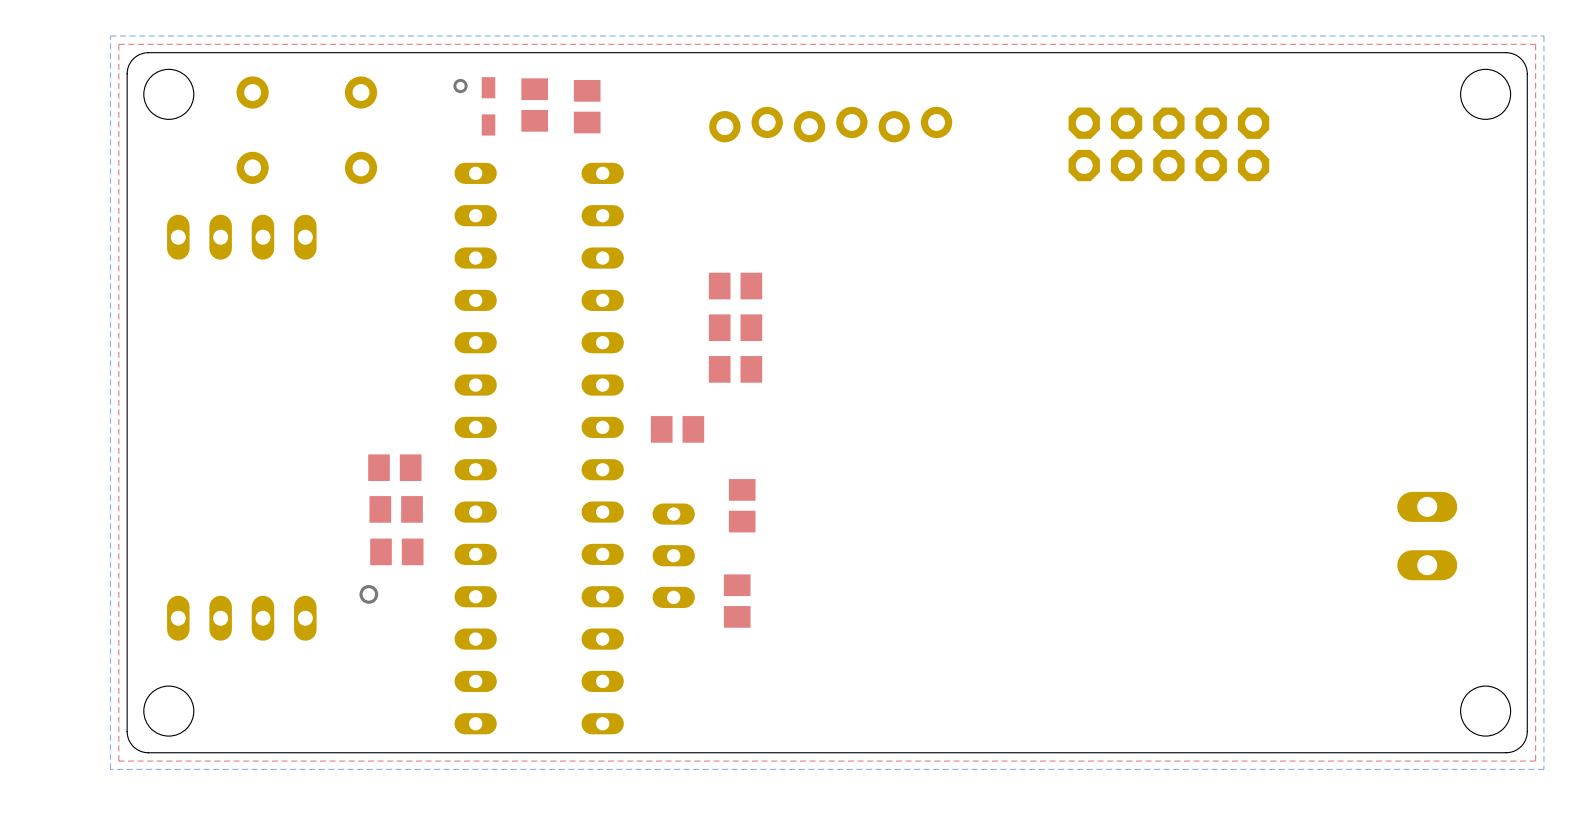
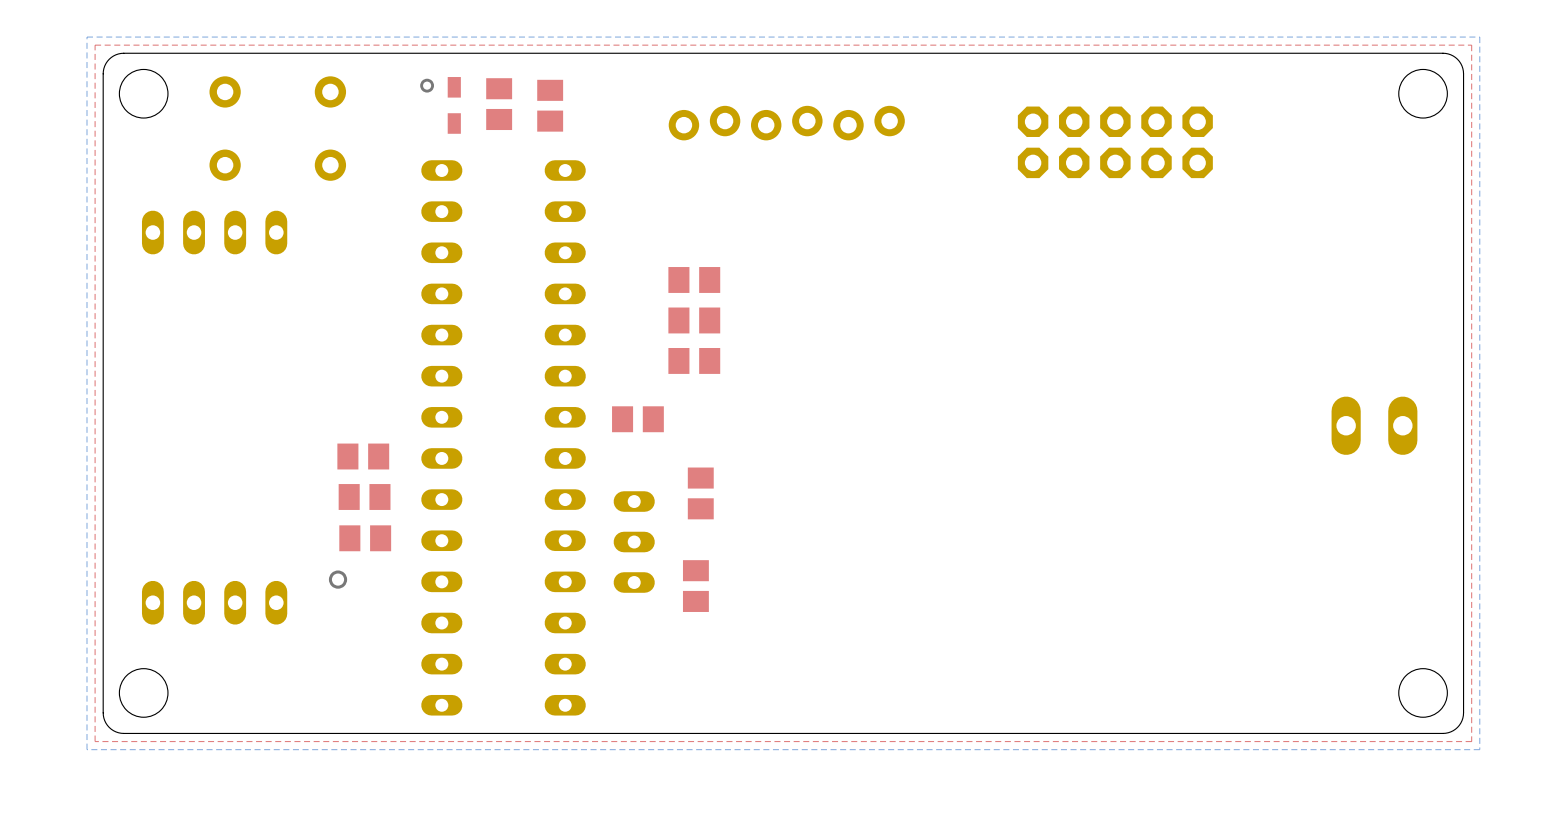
part rotation: 0° (1427, 536) -> 90° clockwise (1374, 425)
part position: (1427, 536) -> (1374, 425)

